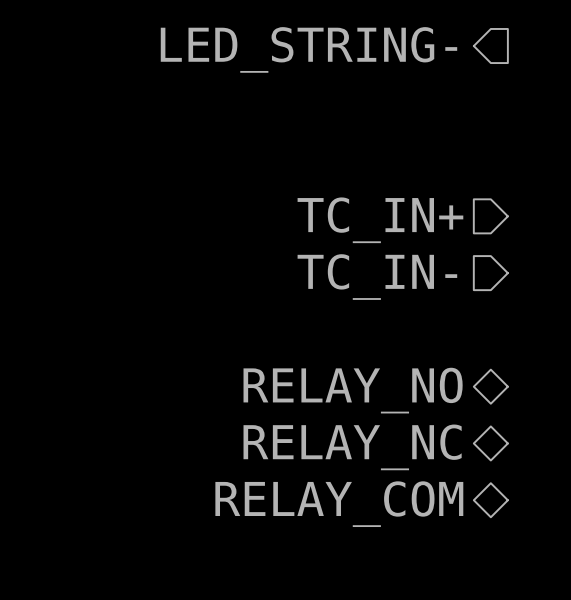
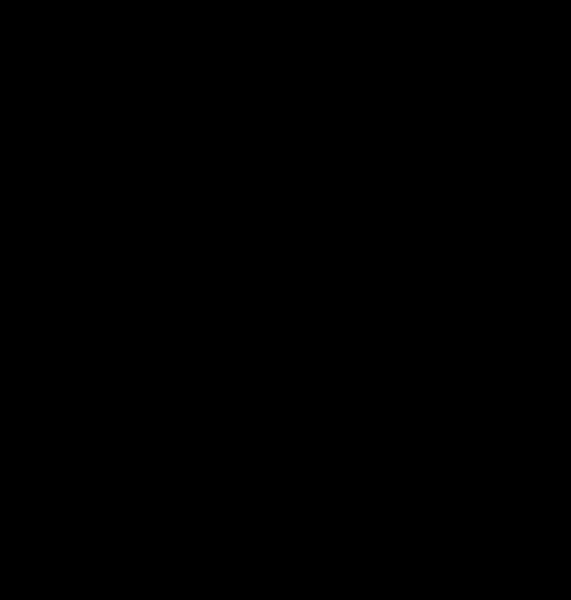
hierarchical label: LED_STRING- (308, 49) -> none
hierarchical label: TC_IN+ (380, 220) -> none
hierarchical label: TC_IN- (377, 277) -> none
hierarchical label: RELAY_NO (353, 390) -> none
hierarchical label: RELAY_NC (352, 447) -> none
hierarchical label: RELAY_COM (339, 504) -> none

